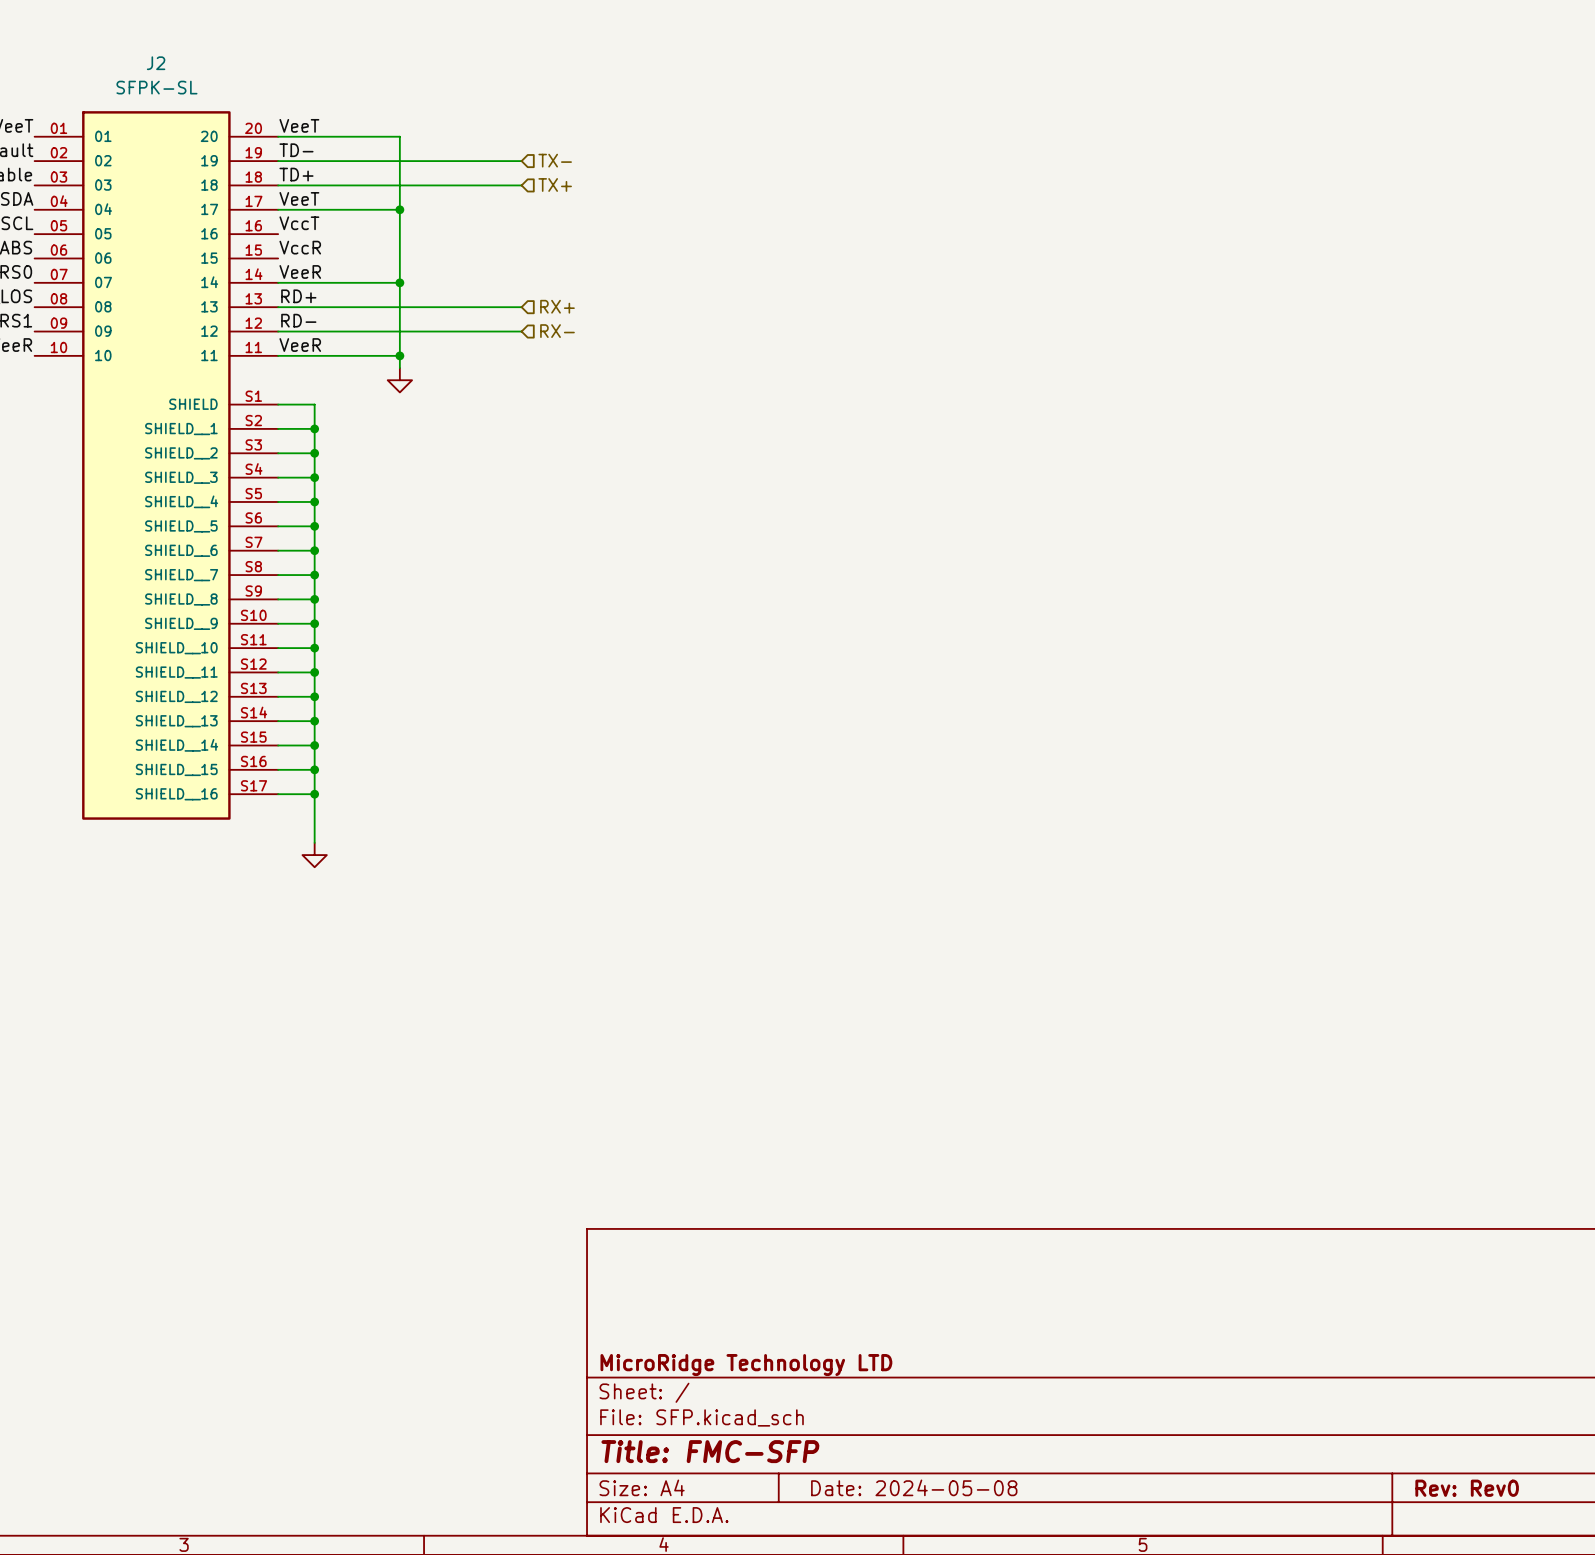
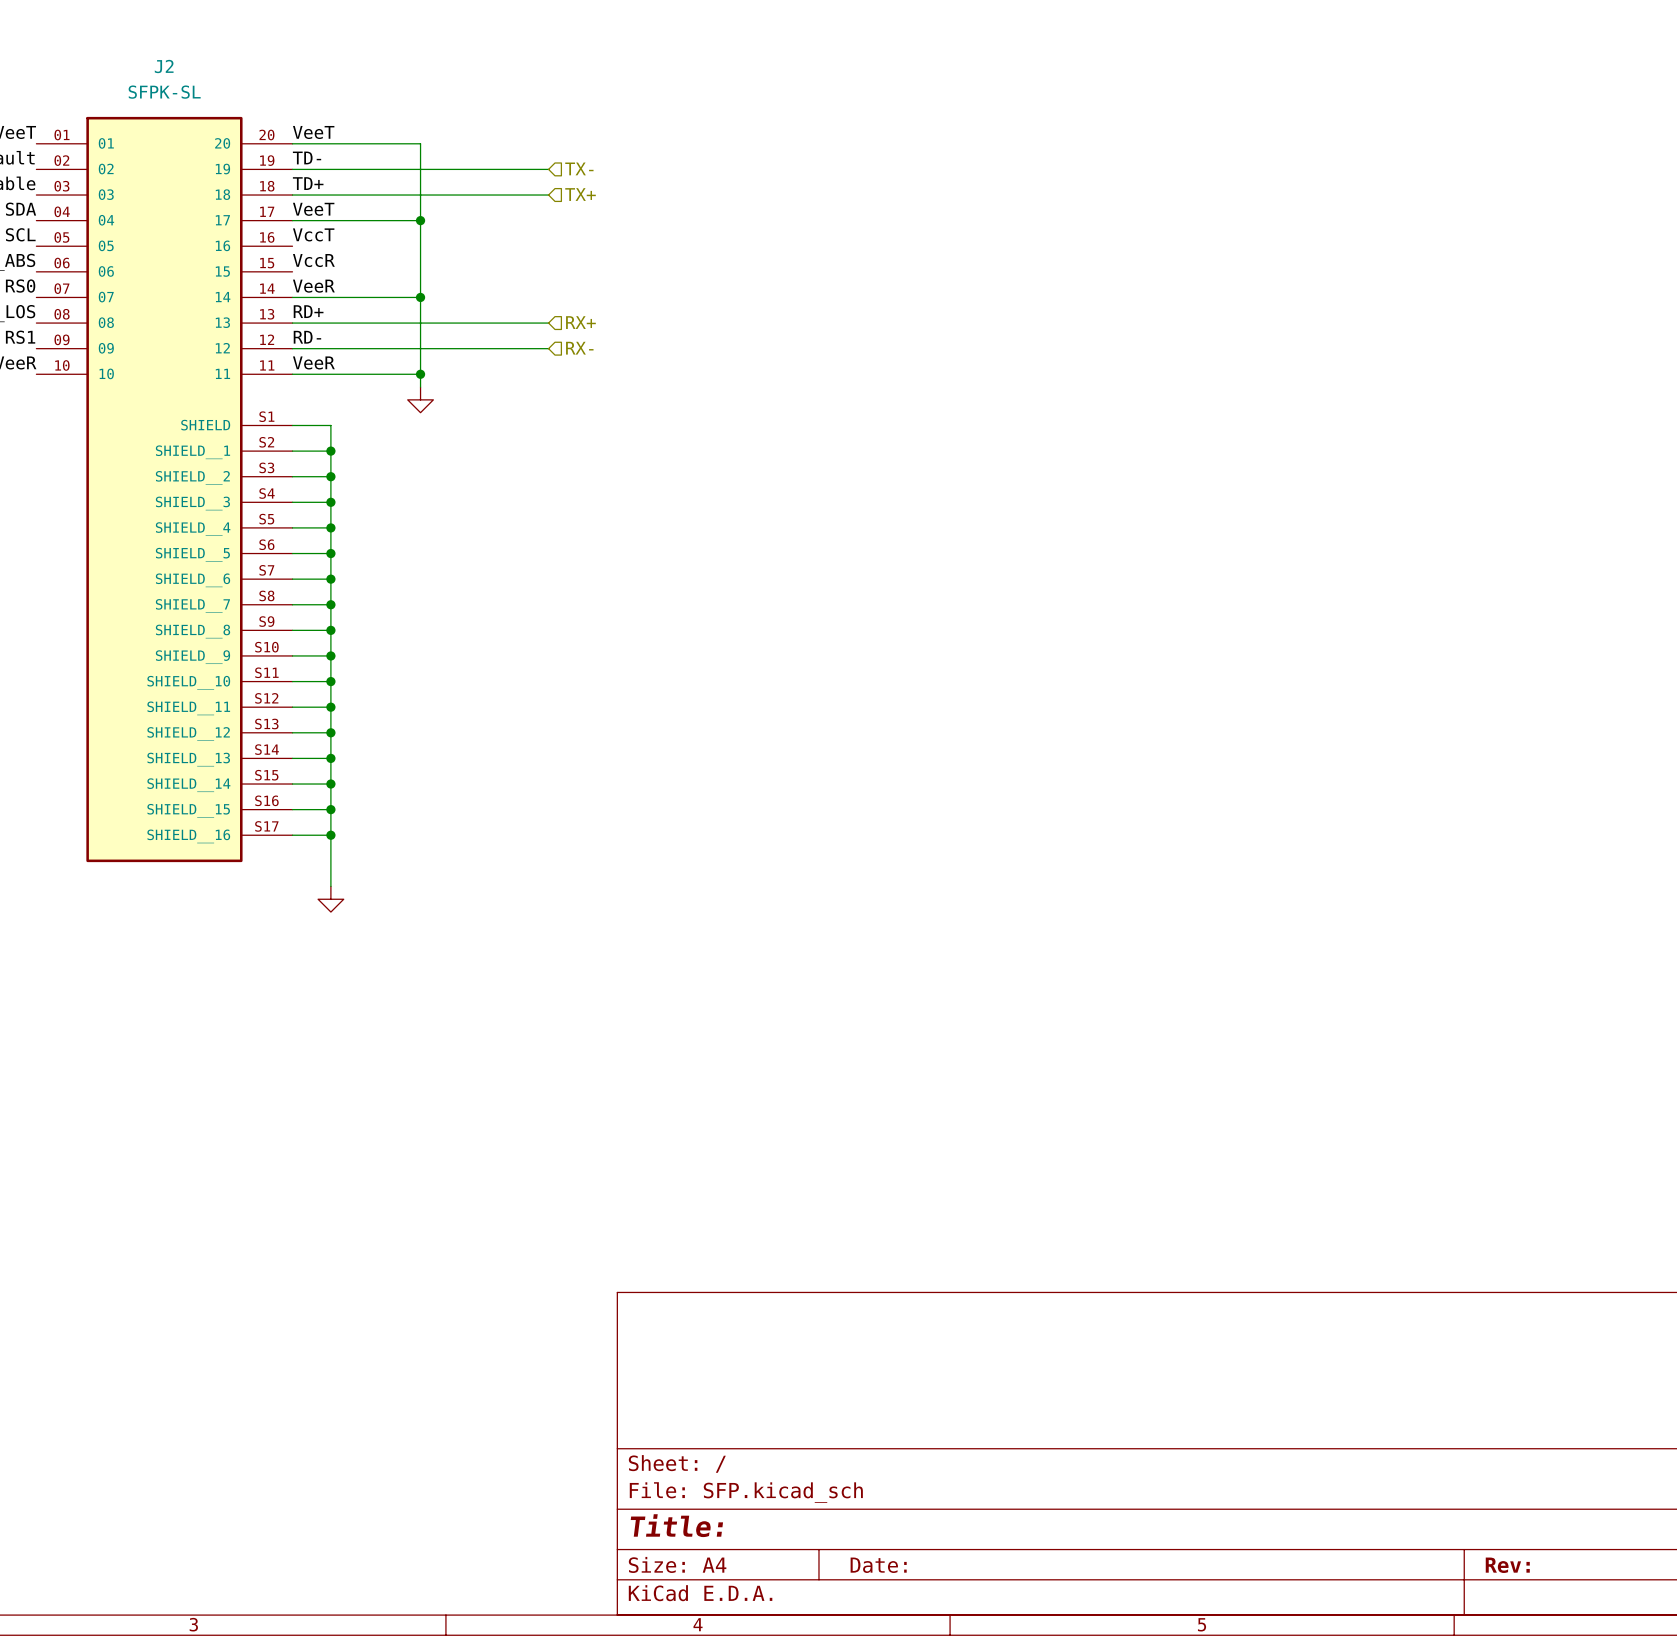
title block: MicroRidge Technology LTD (746, 1365) -> none
title block: Title: FMC-SFP (710, 1451) -> Title: (676, 1525)
title block: Date: 2024-05-08 (914, 1487) -> Date: (878, 1565)
title block: Rev: Rev0 (1467, 1488) -> Rev: (1507, 1565)

